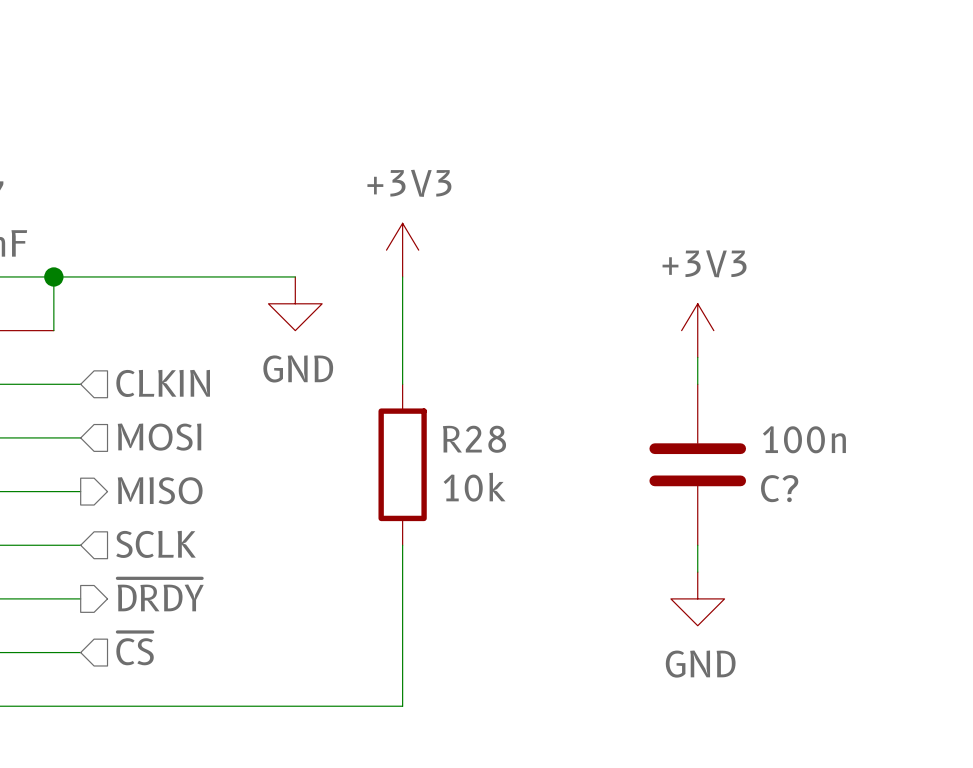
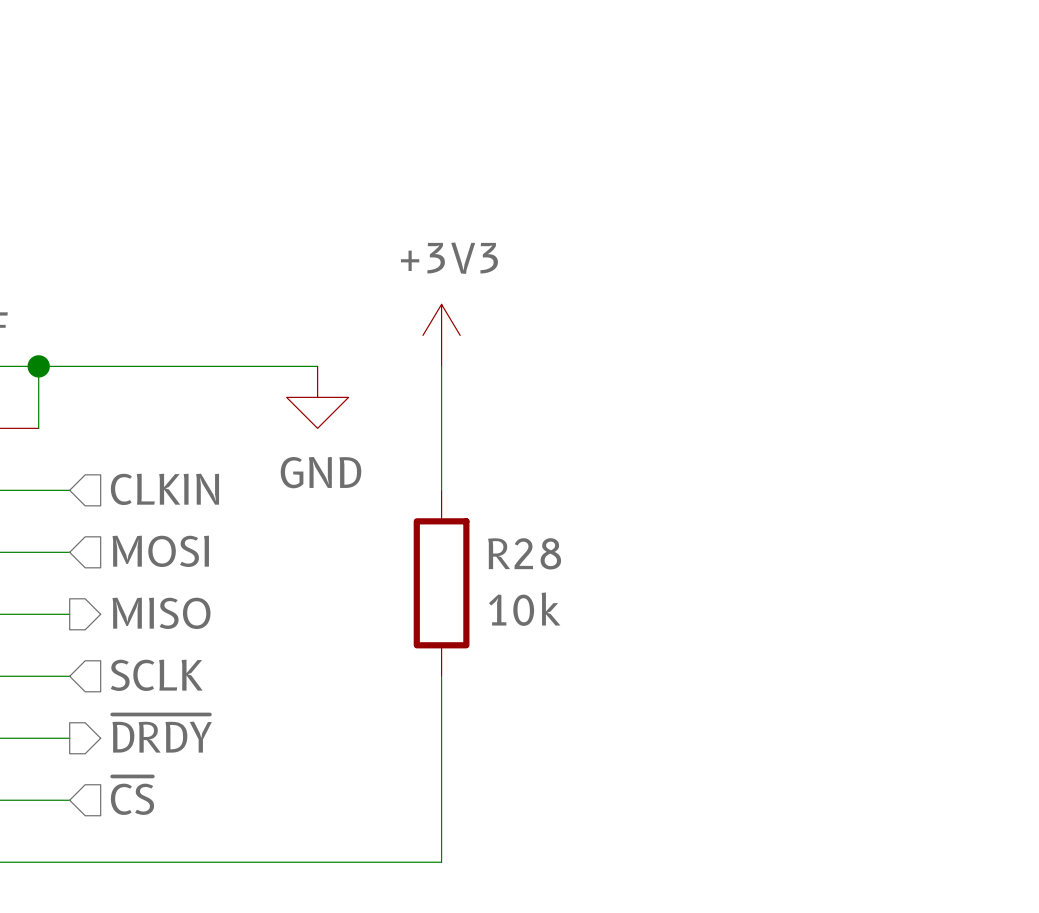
power symbol: +3V3 (697, 330) -> none
wire: (697, 357) (697, 384) -> none
C?: 100n (697, 464) -> none
wire: (697, 545) (697, 572) -> none
power symbol: GND (697, 598) -> none

